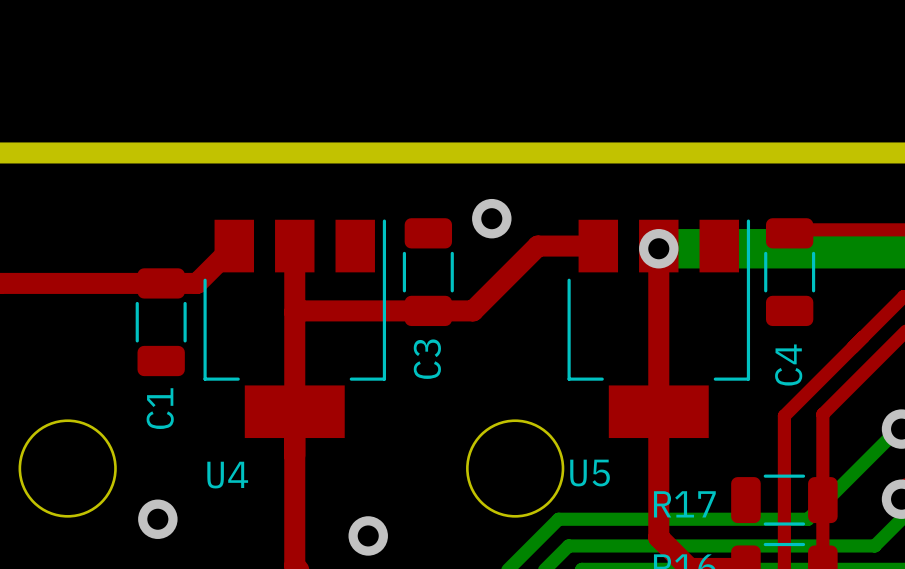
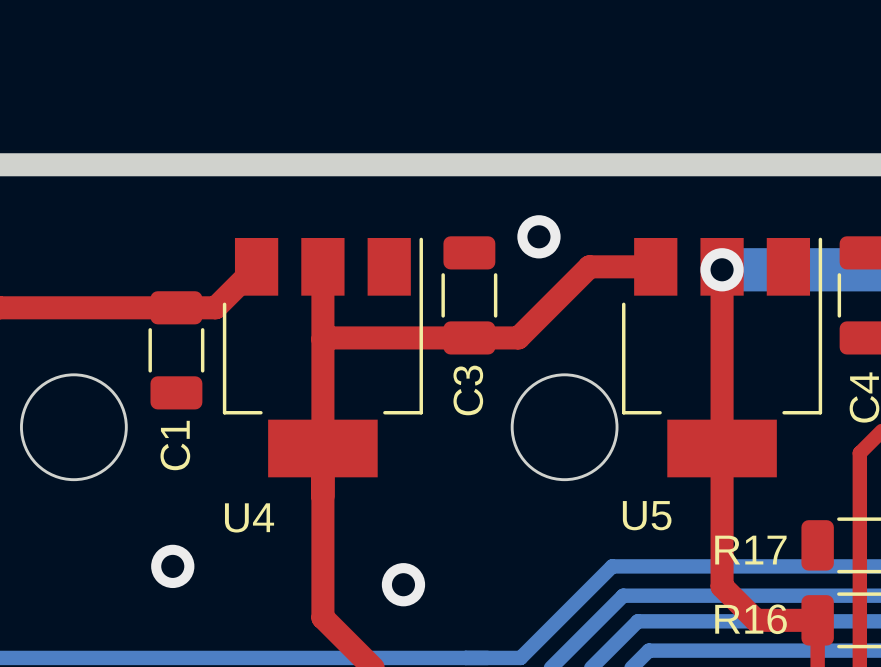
round board edge position: (67, 468) -> (73, 427)
round board edge position: (515, 468) -> (564, 427)

